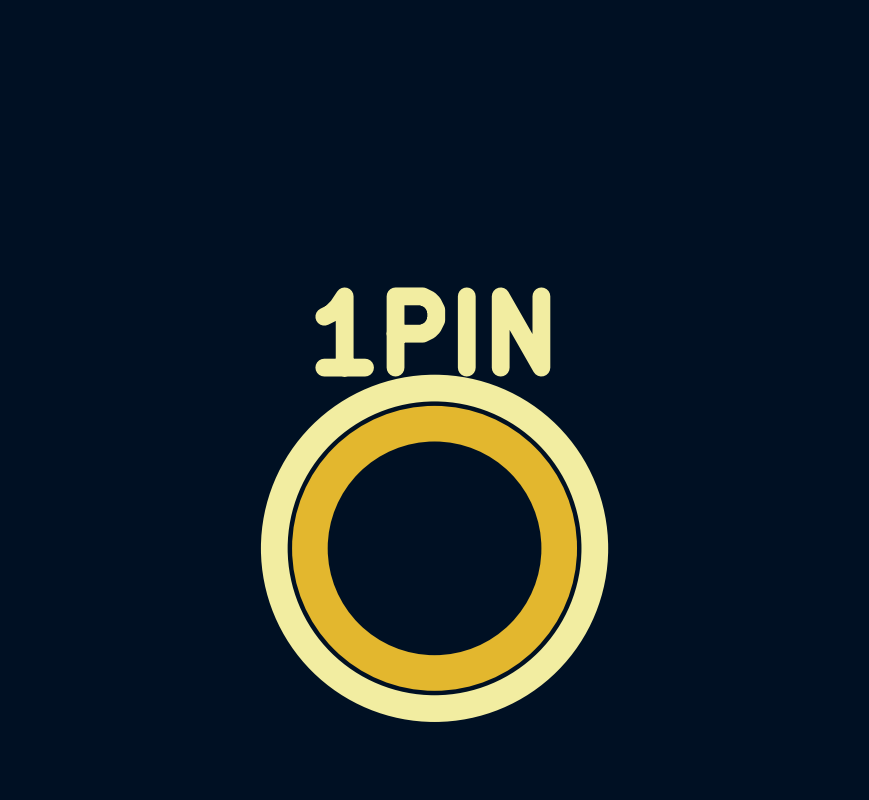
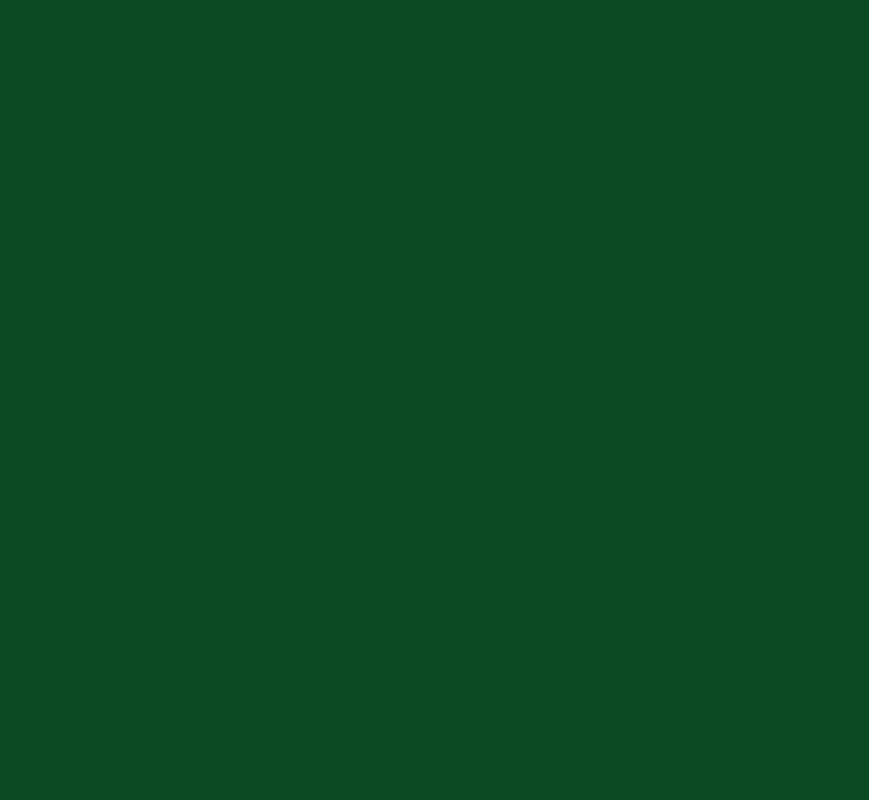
1PIN: (434, 548) -> none

